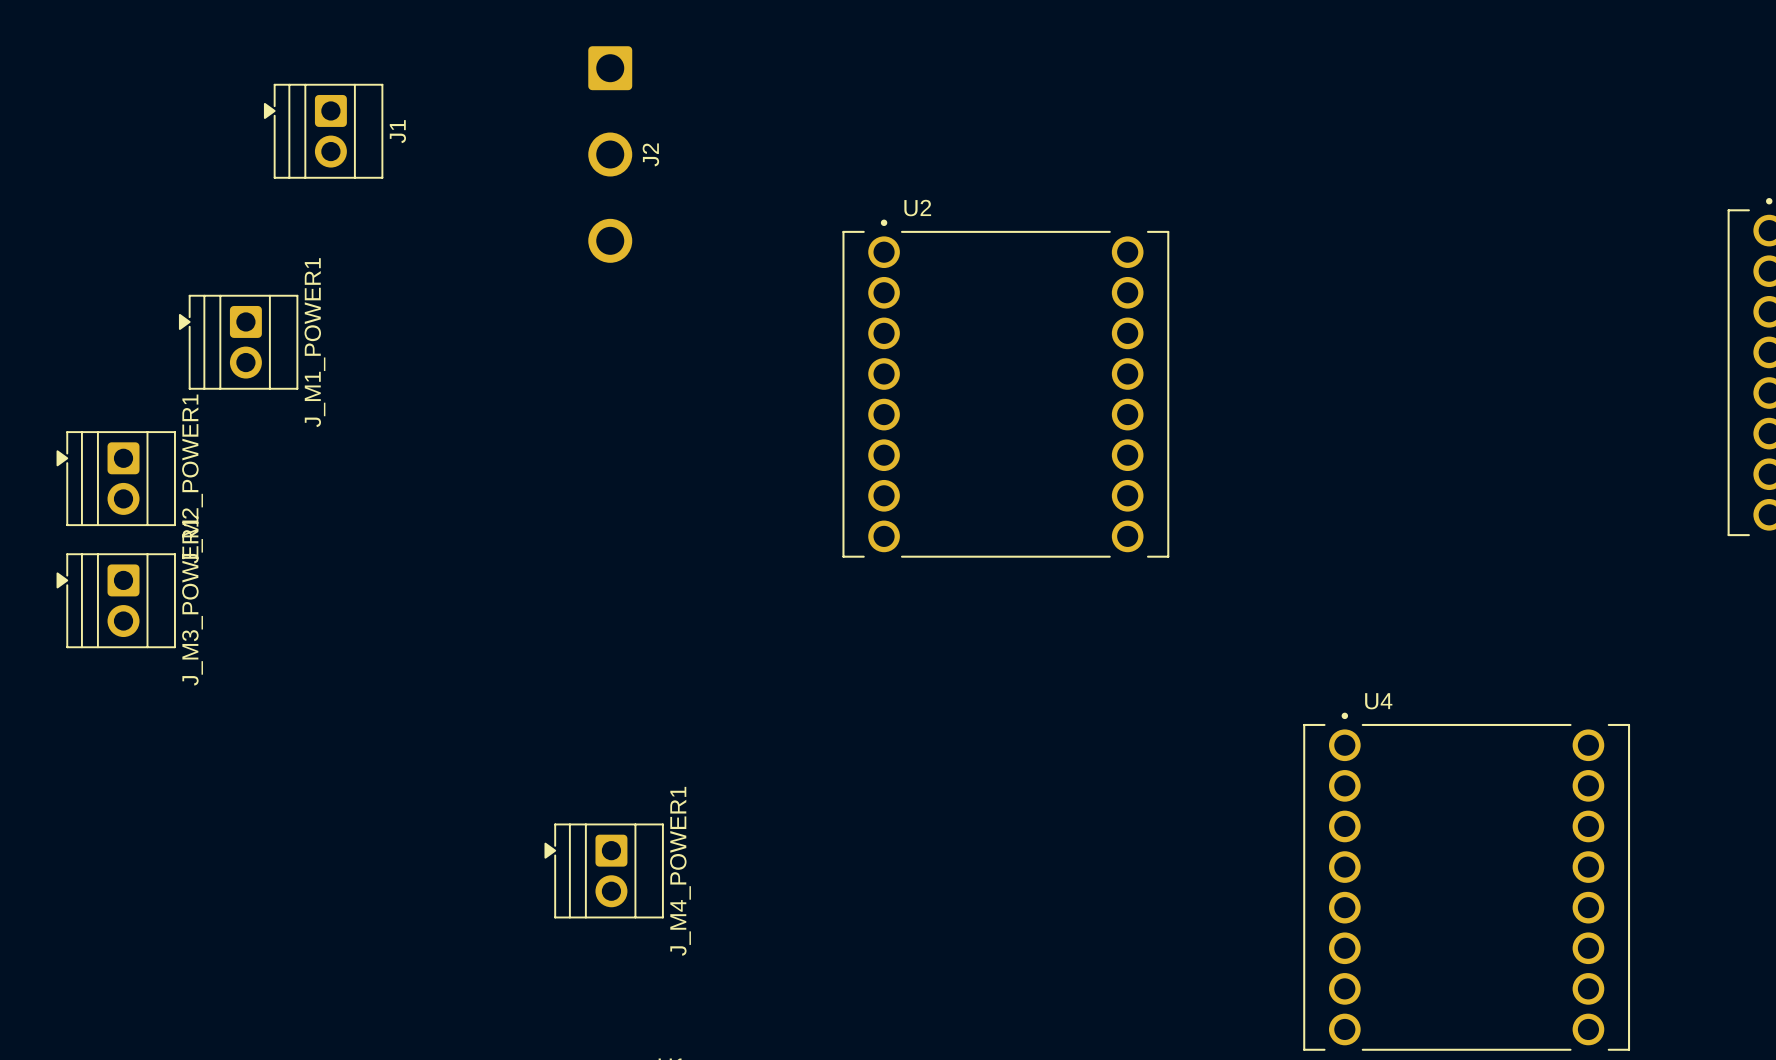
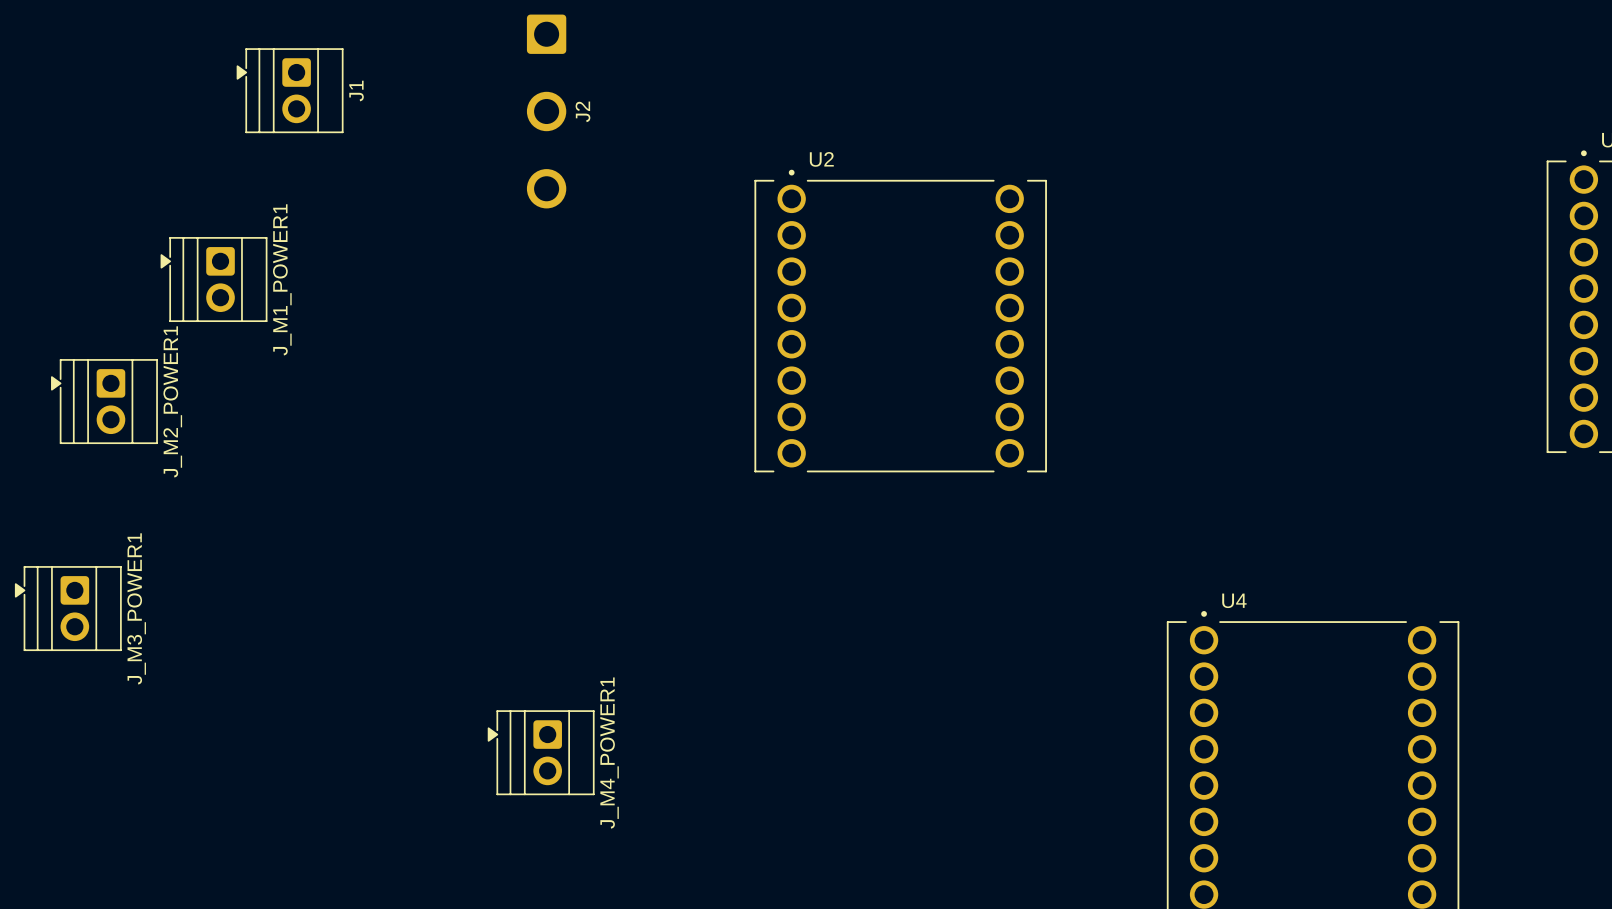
J_M3_POWER1 position: (116, 600) -> (68, 608)

